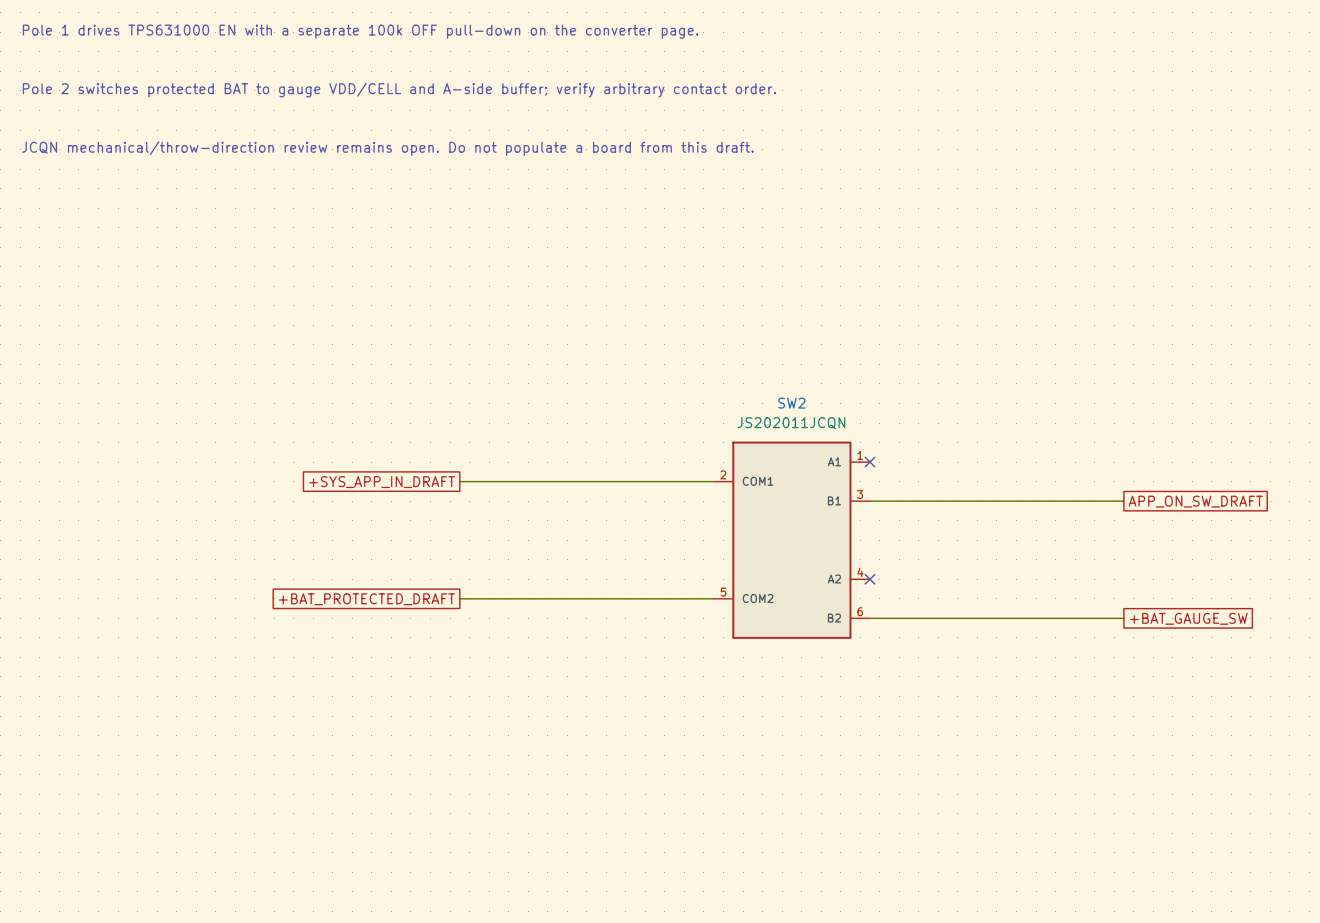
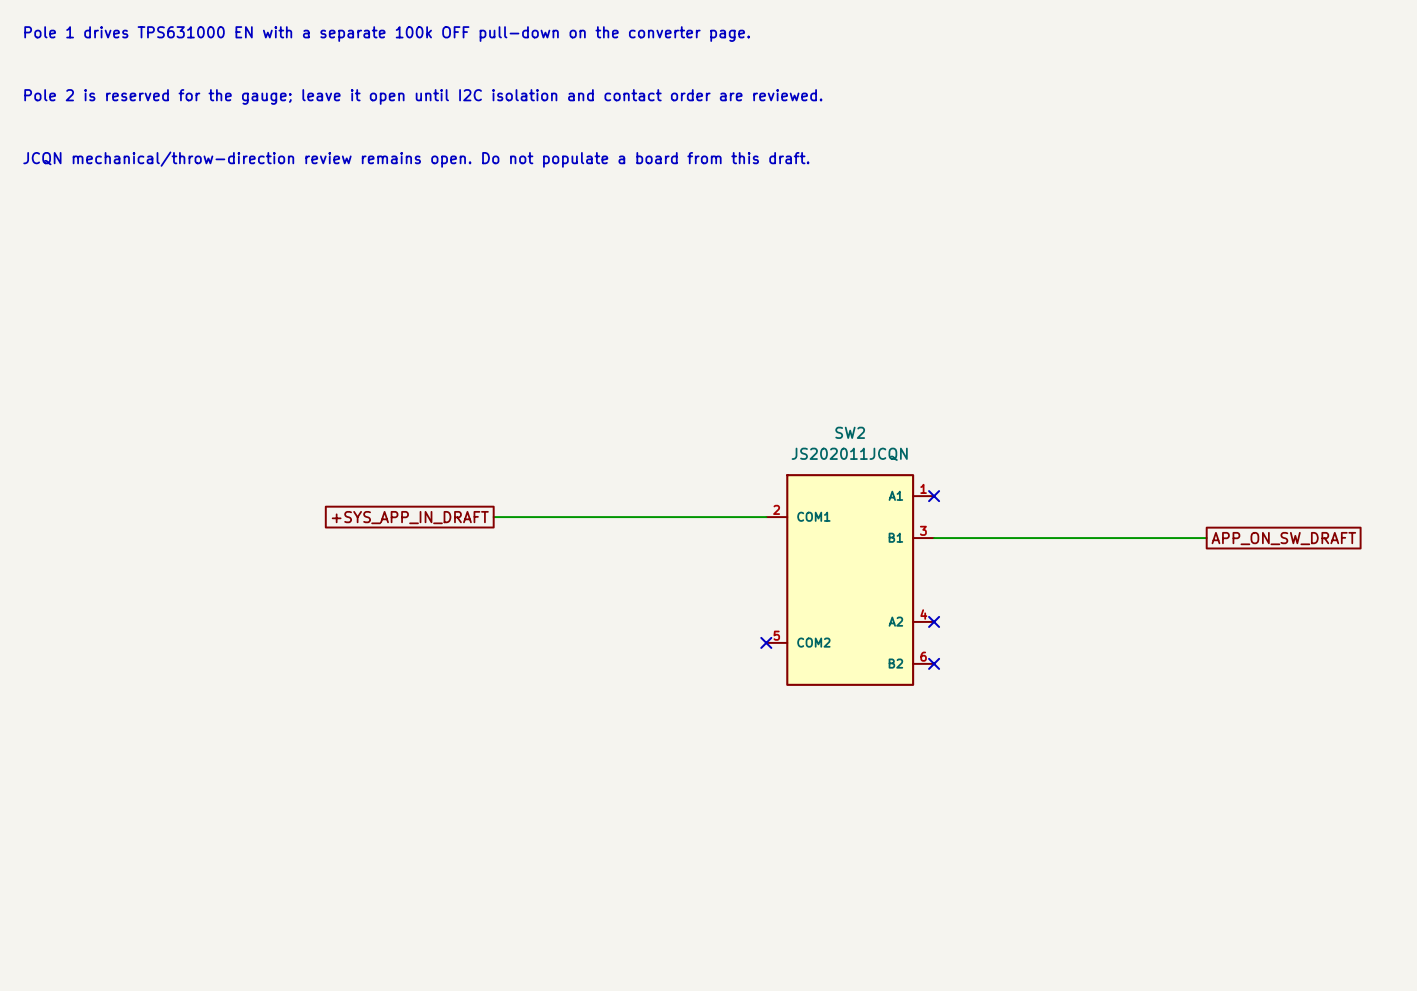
text: Pole 2 switches protected BAT to gauge VDD/CELL and A-side buffer; verify arbitrary contact order. (399, 90) -> Pole 2 is reserved for the gauge; leave it open until I2C isolation and contact order are reviewed. (423, 96)
wire: (459, 598) (713, 598) -> none
no-connect mark: none -> (766, 642)
global label: +BAT_PROTECTED_DRAFT (367, 599) -> none
wire: (870, 618) (1123, 618) -> none
no-connect mark: none -> (934, 663)
global label: +BAT_GAUGE_SW (1188, 618) -> none

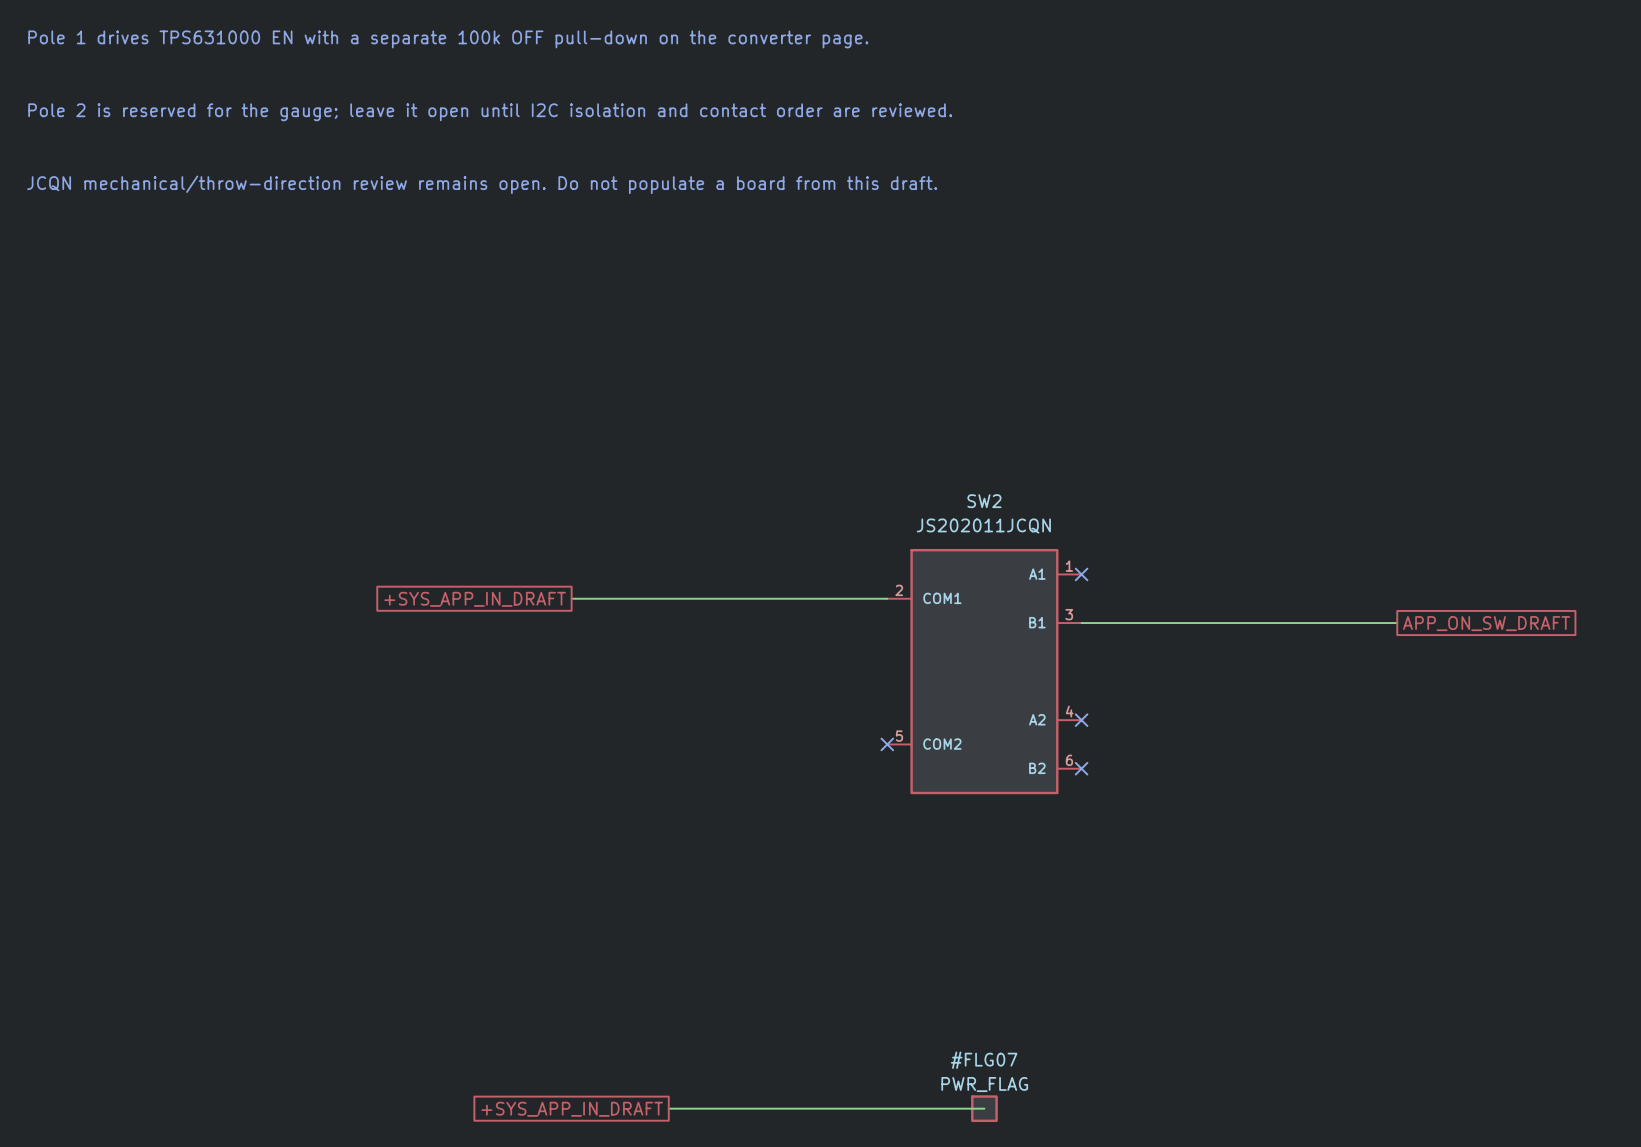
global label: none -> +SYS_APP_IN_DRAFT (572, 1109)
wire: none -> (668, 1108) (984, 1108)
#FLG07: none -> PWR_FLAG (984, 1108)

